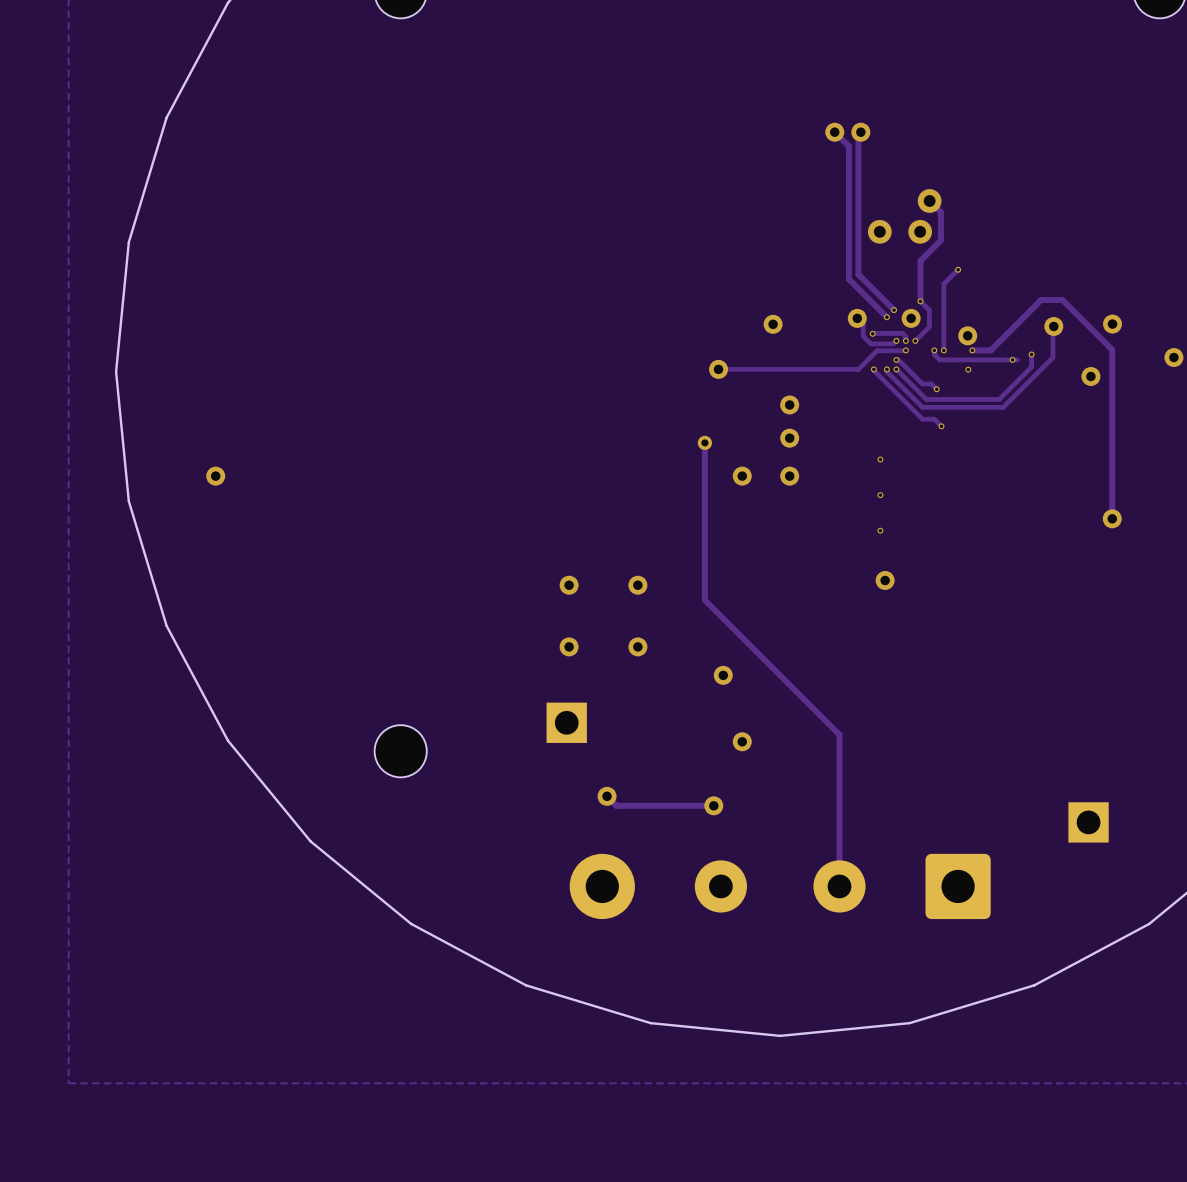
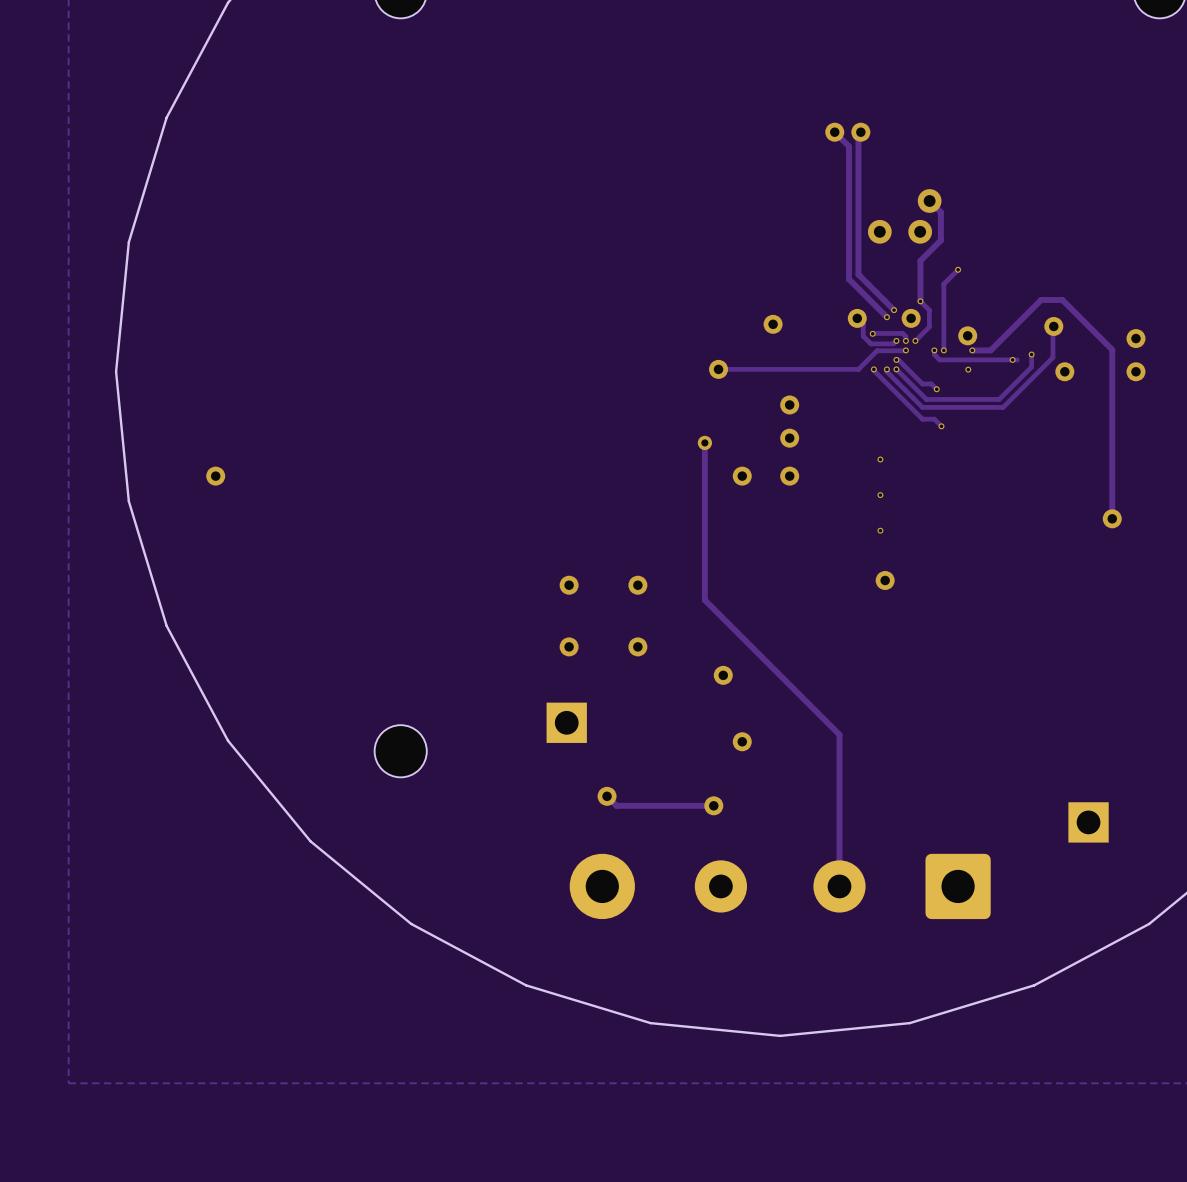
via: (1112, 324) -> none
via: none -> (1135, 338)
via: (1173, 357) -> none
via: none -> (1064, 371)
via: none -> (1135, 371)
via: (1090, 376) -> none

